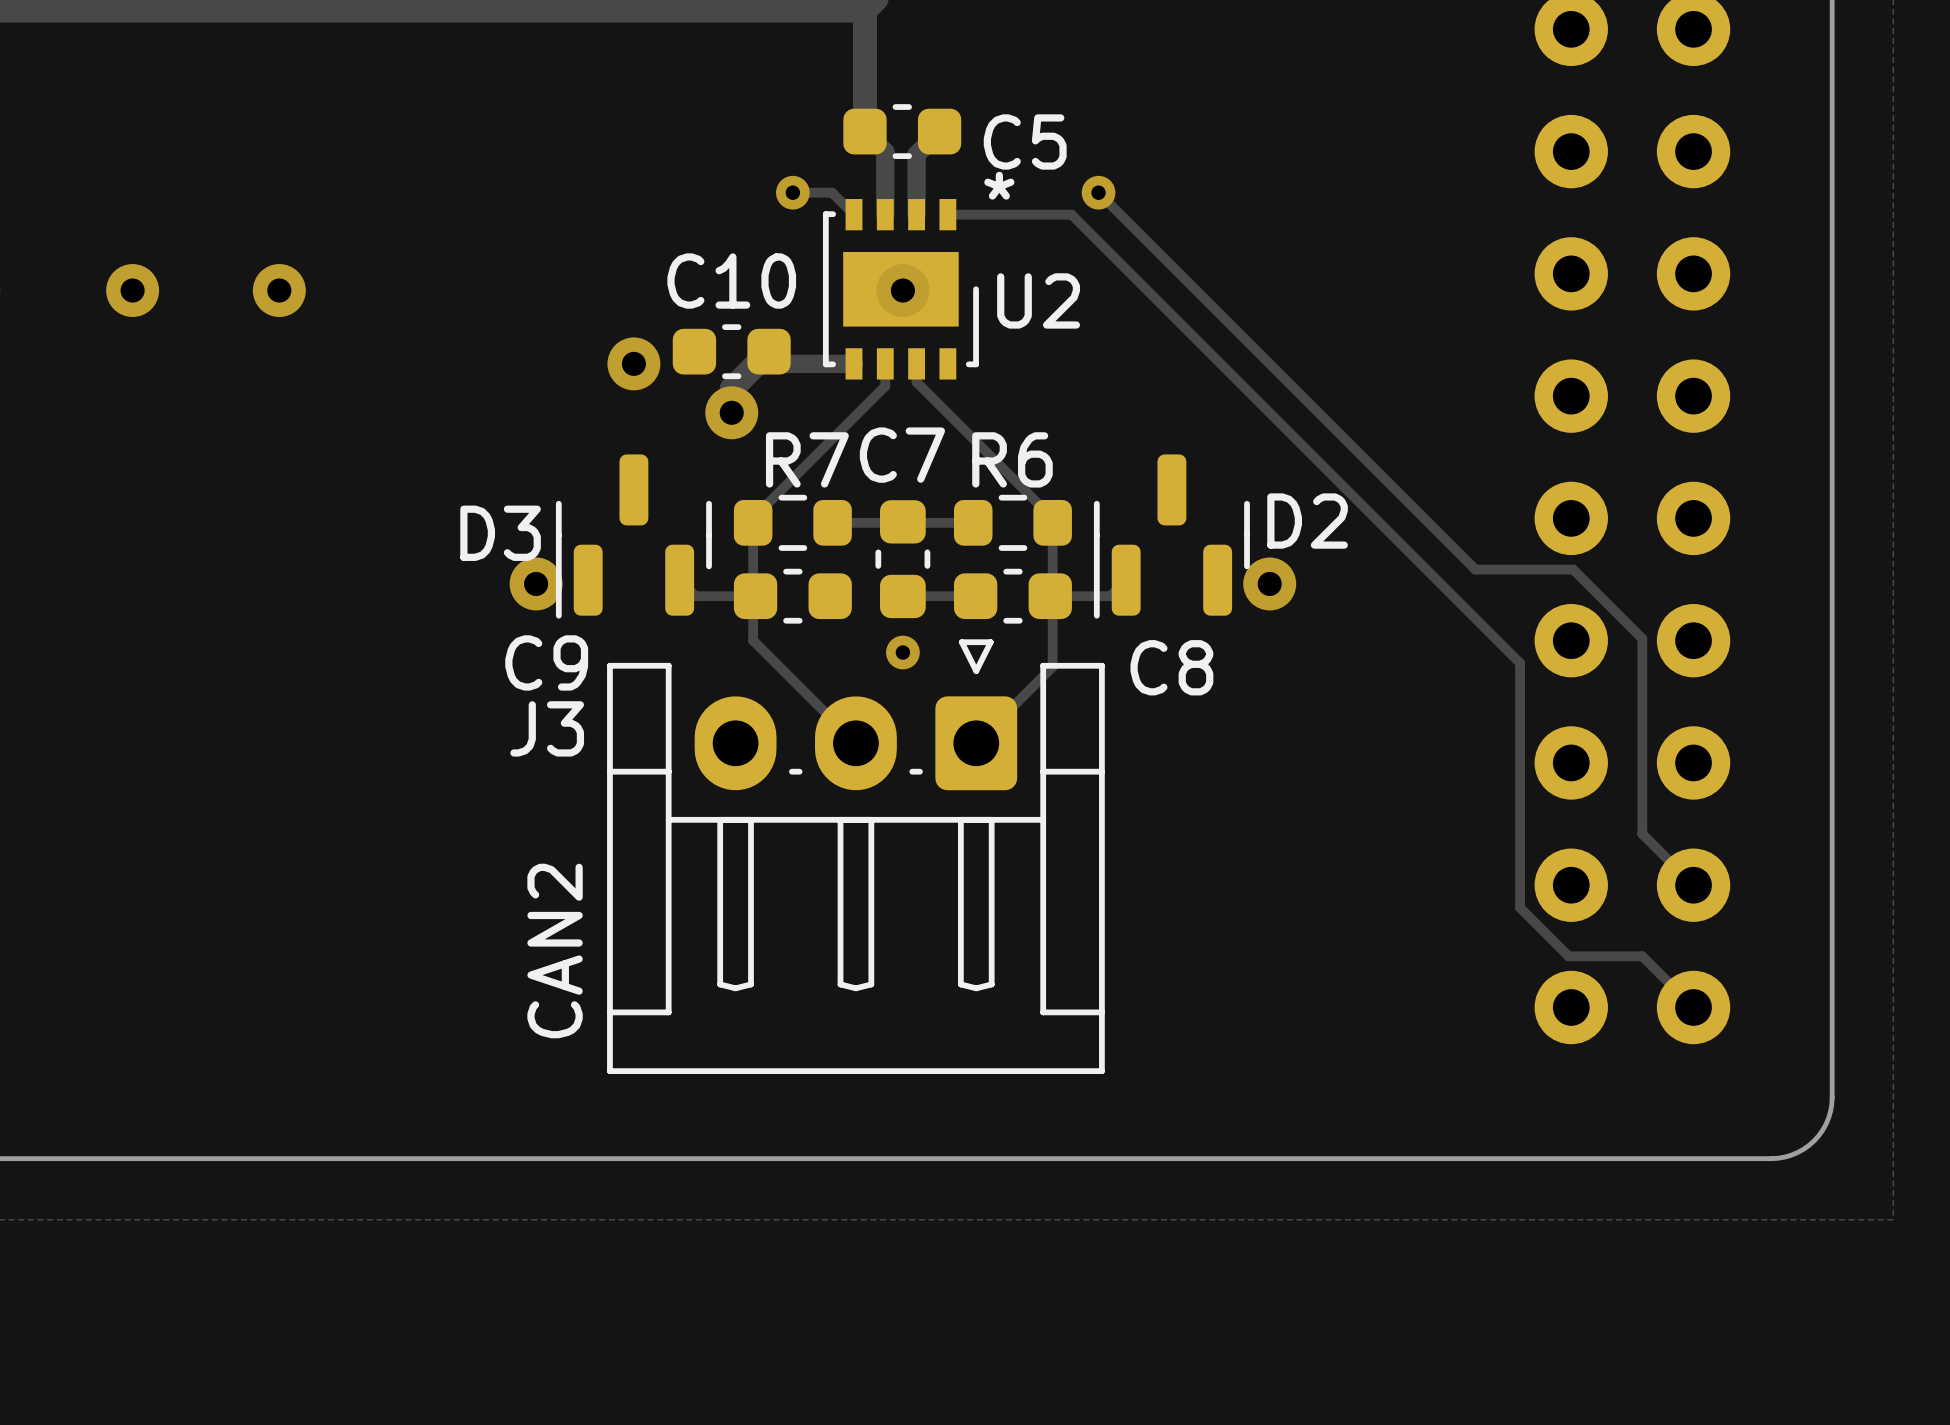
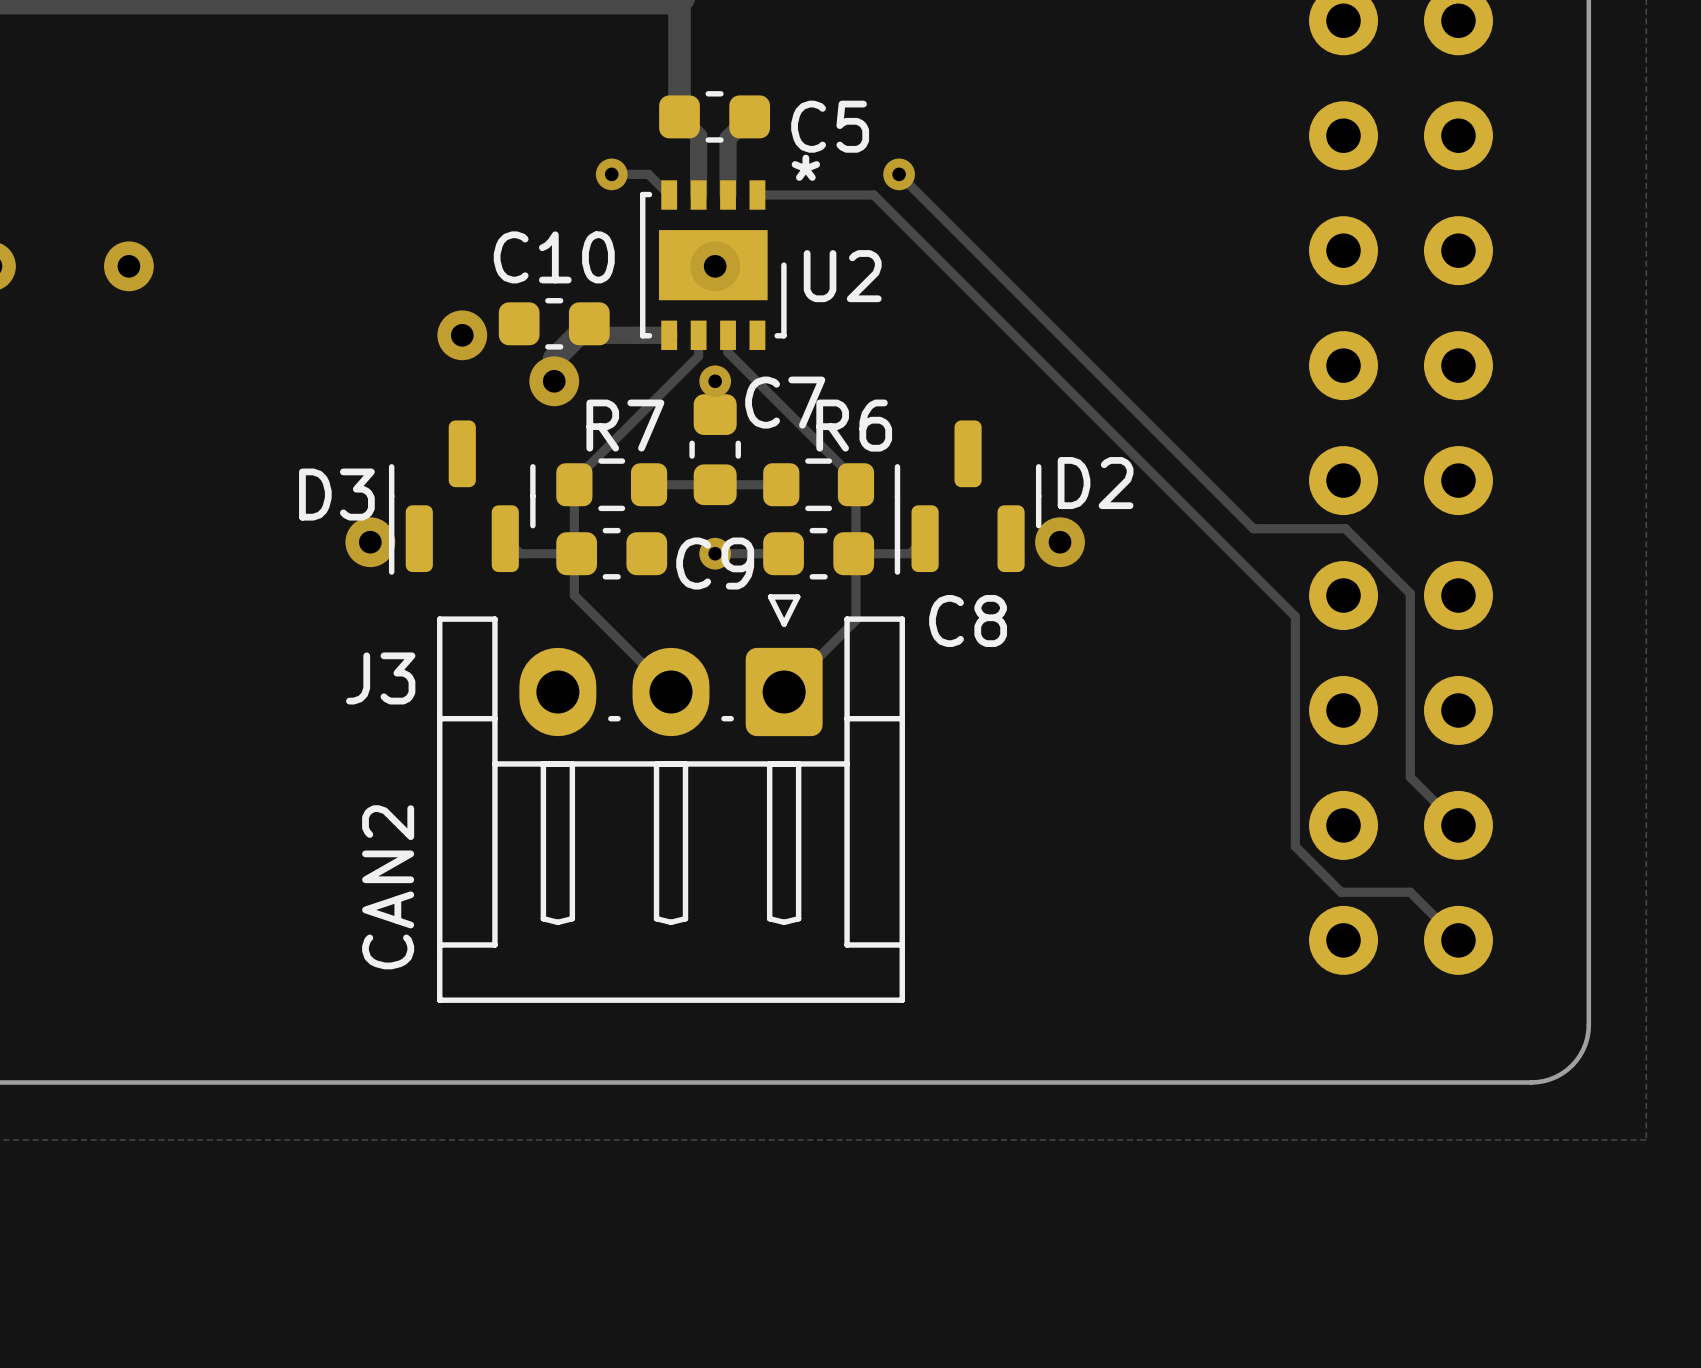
via: none -> (715, 381)
C7 name position: C7 (902, 455) -> C7 (785, 402)
R6 name position: R6 (1012, 459) -> R6 (854, 425)
C7 position: (902, 559) -> (715, 449)
via position: (902, 652) -> (715, 553)
C9 name position: C9 (546, 662) -> C9 (715, 563)

